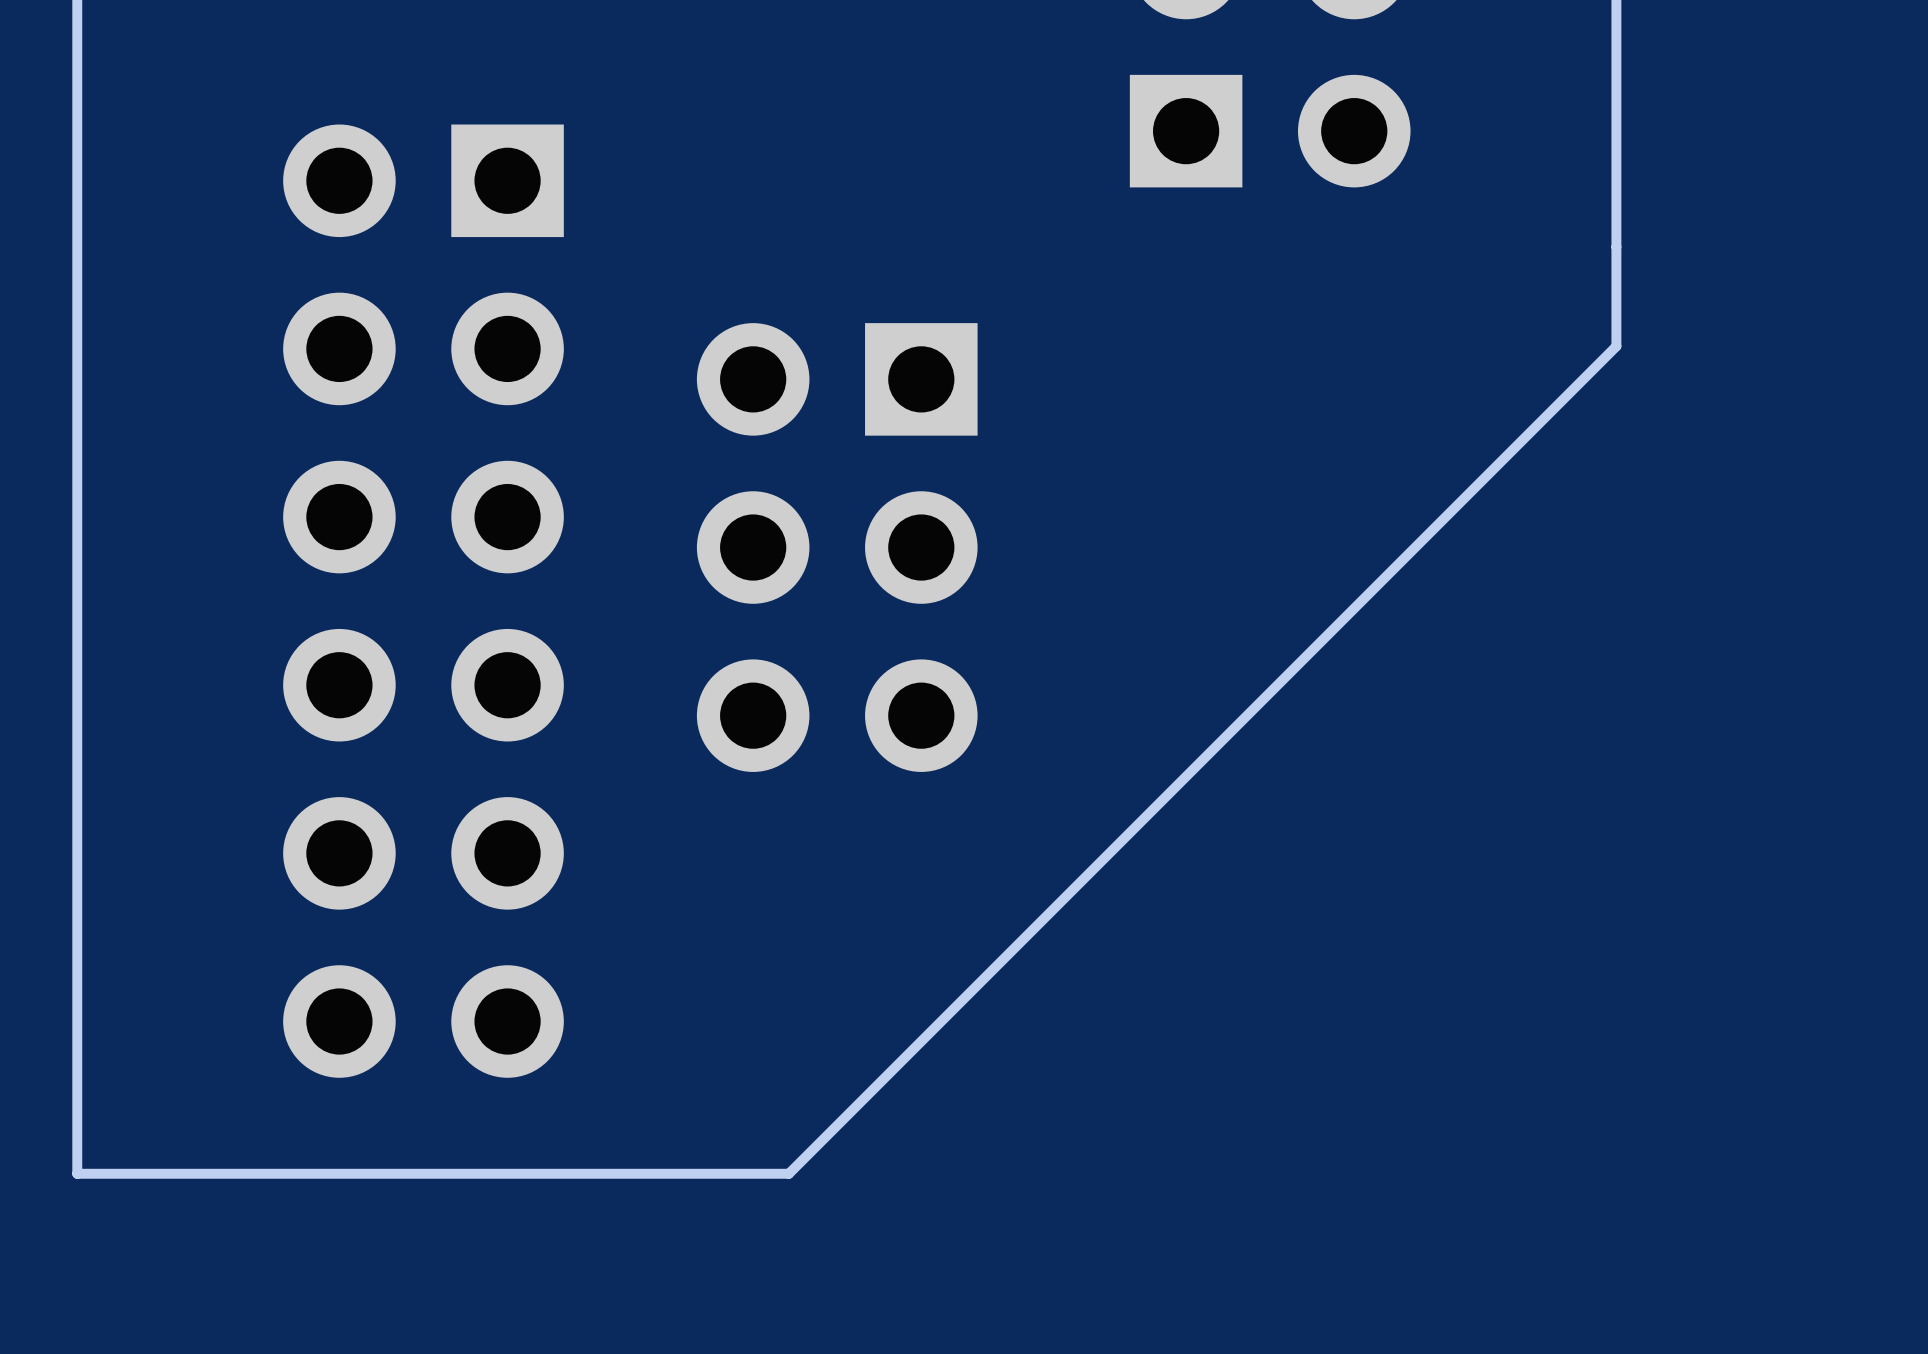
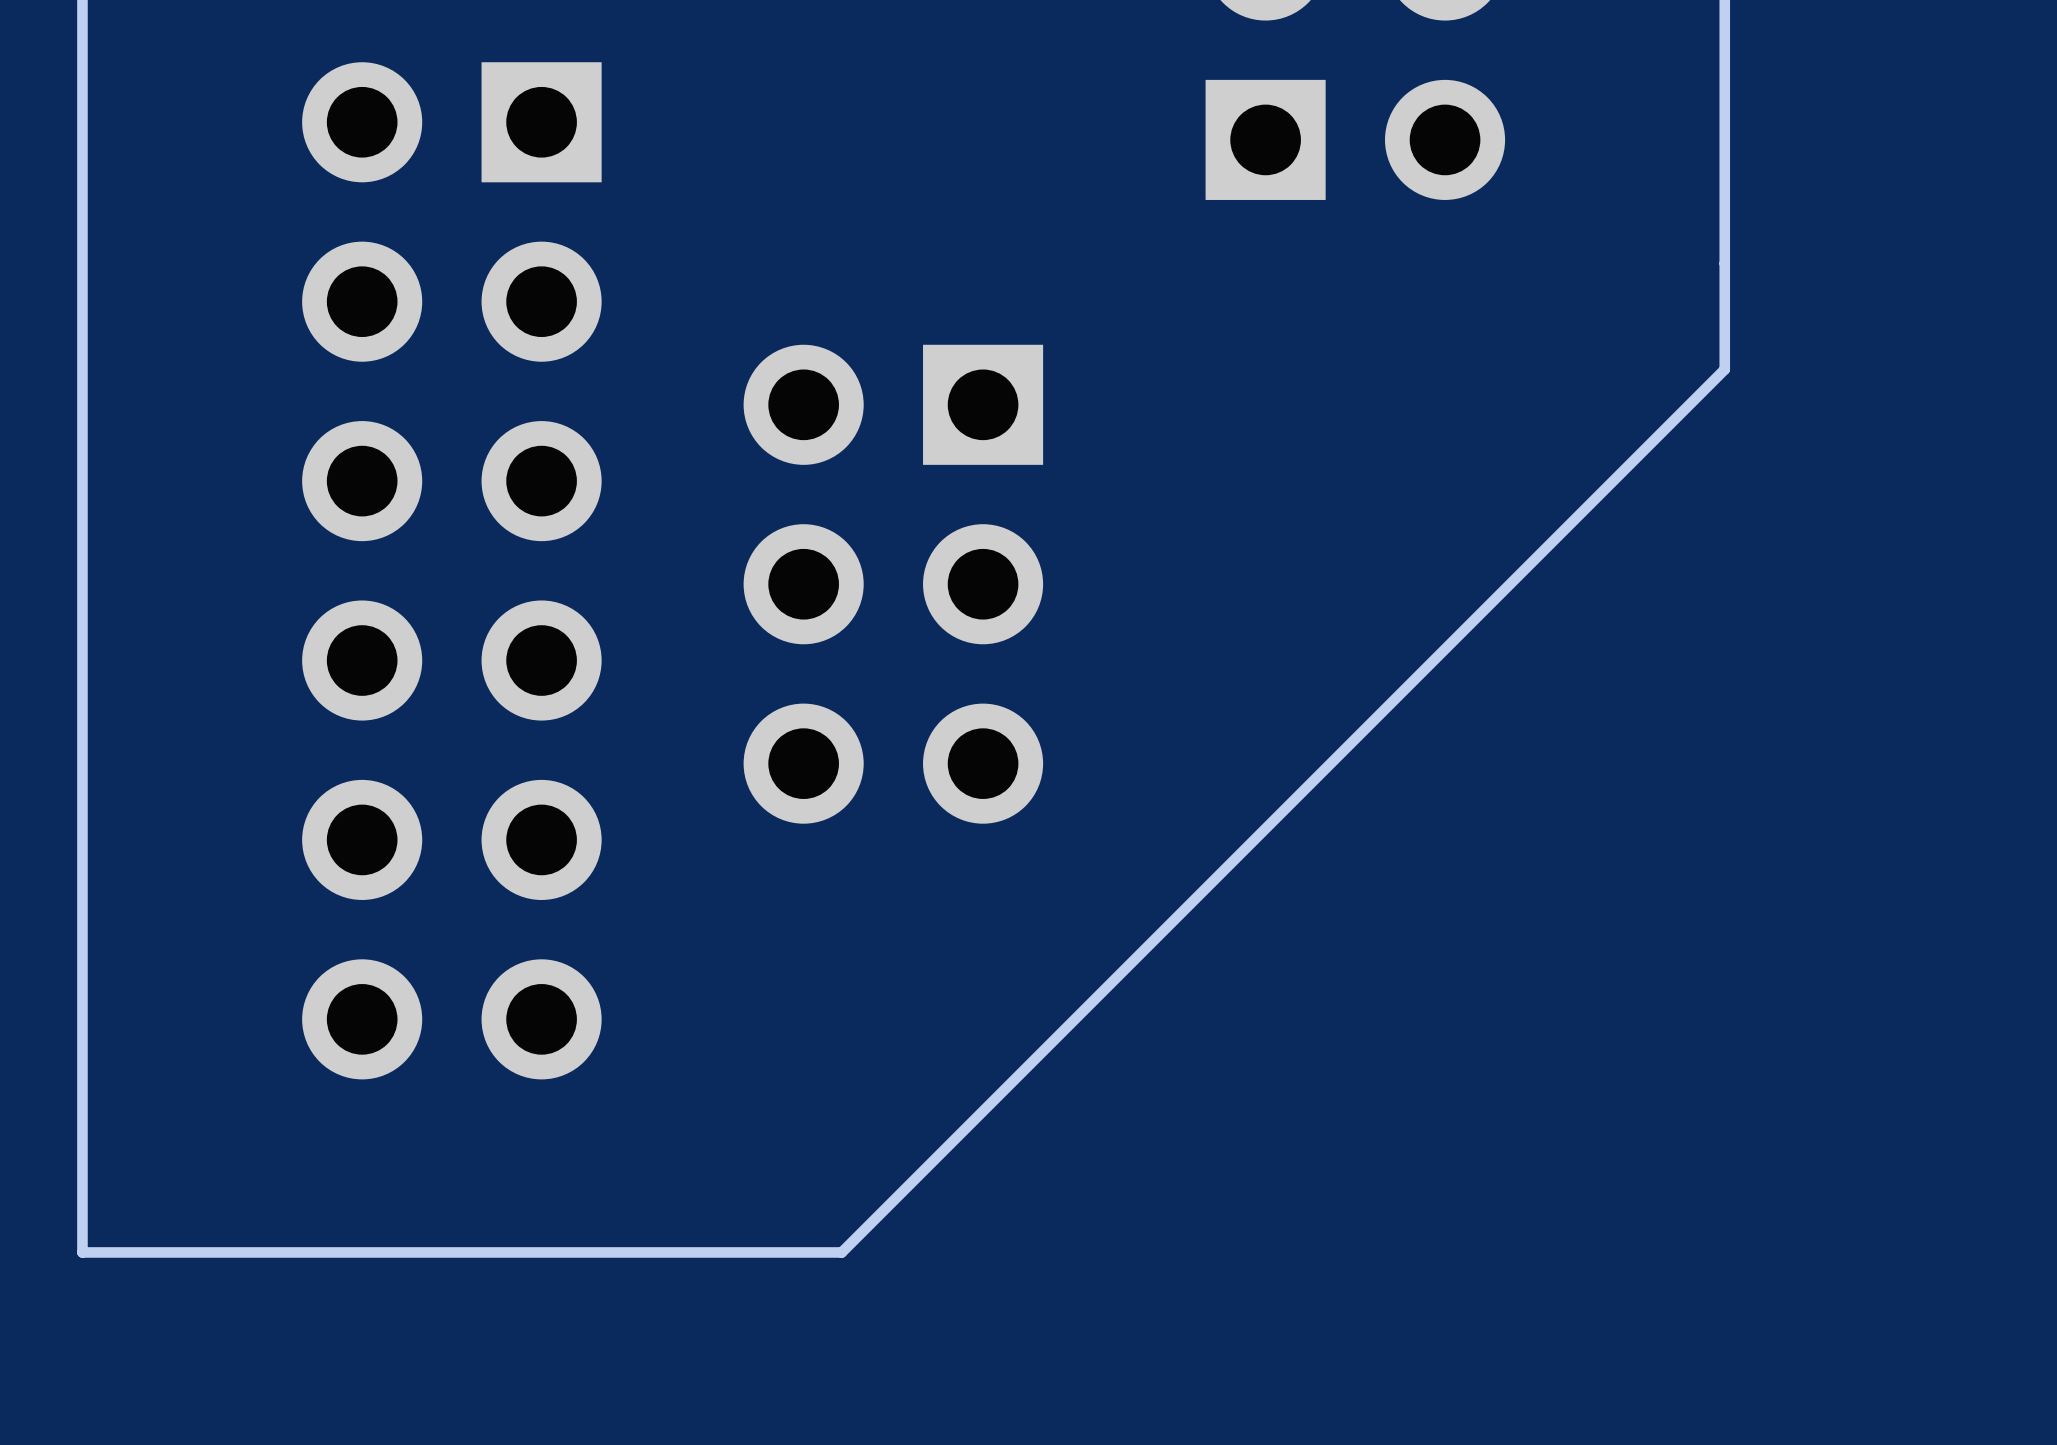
part position: (423, 601) -> (451, 570)

